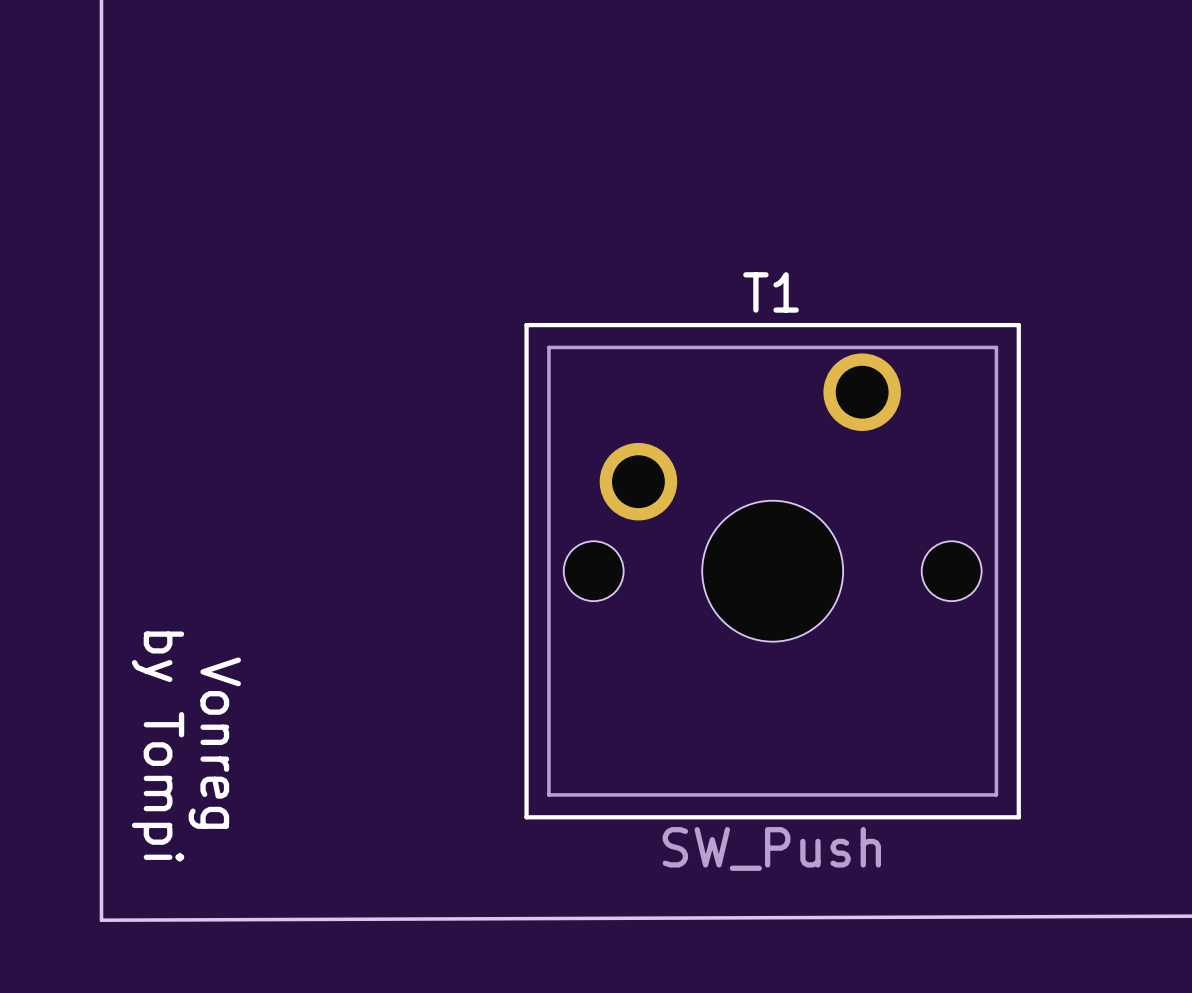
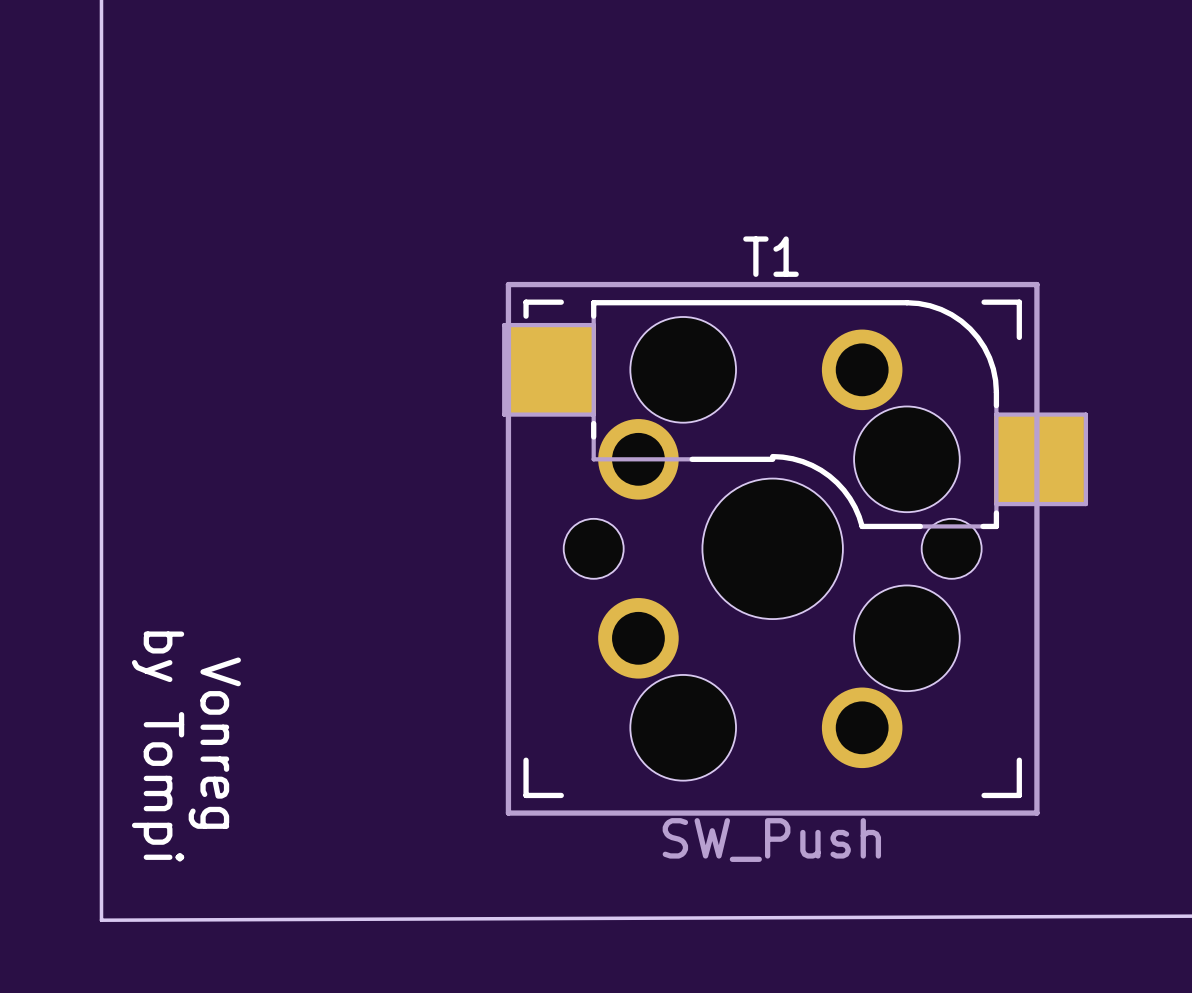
T1 footprint: [524, 322, 1021, 820] -> [502, 281, 1089, 816]

